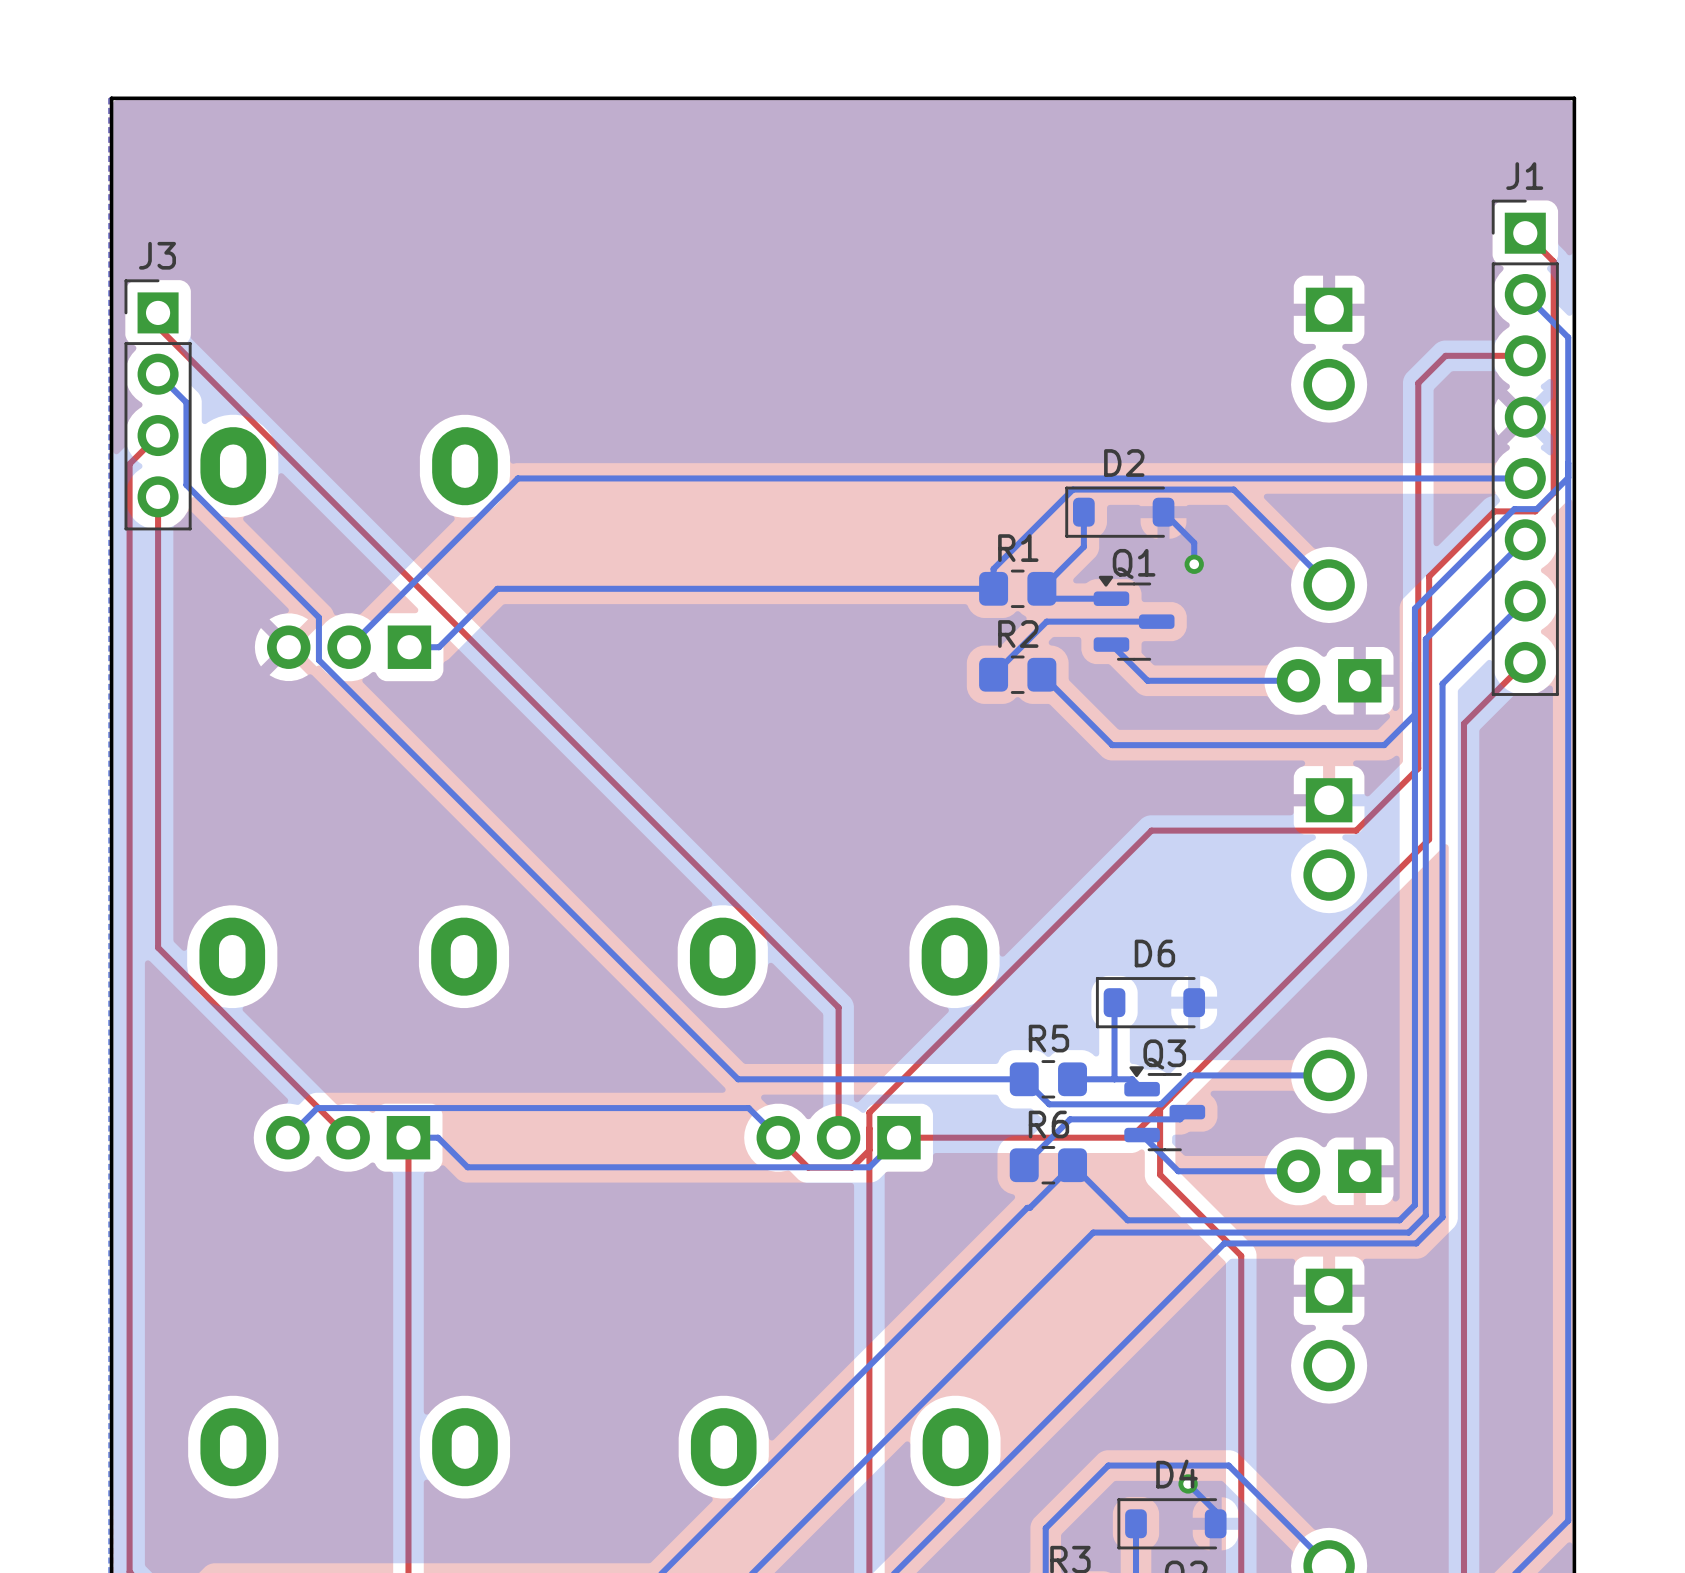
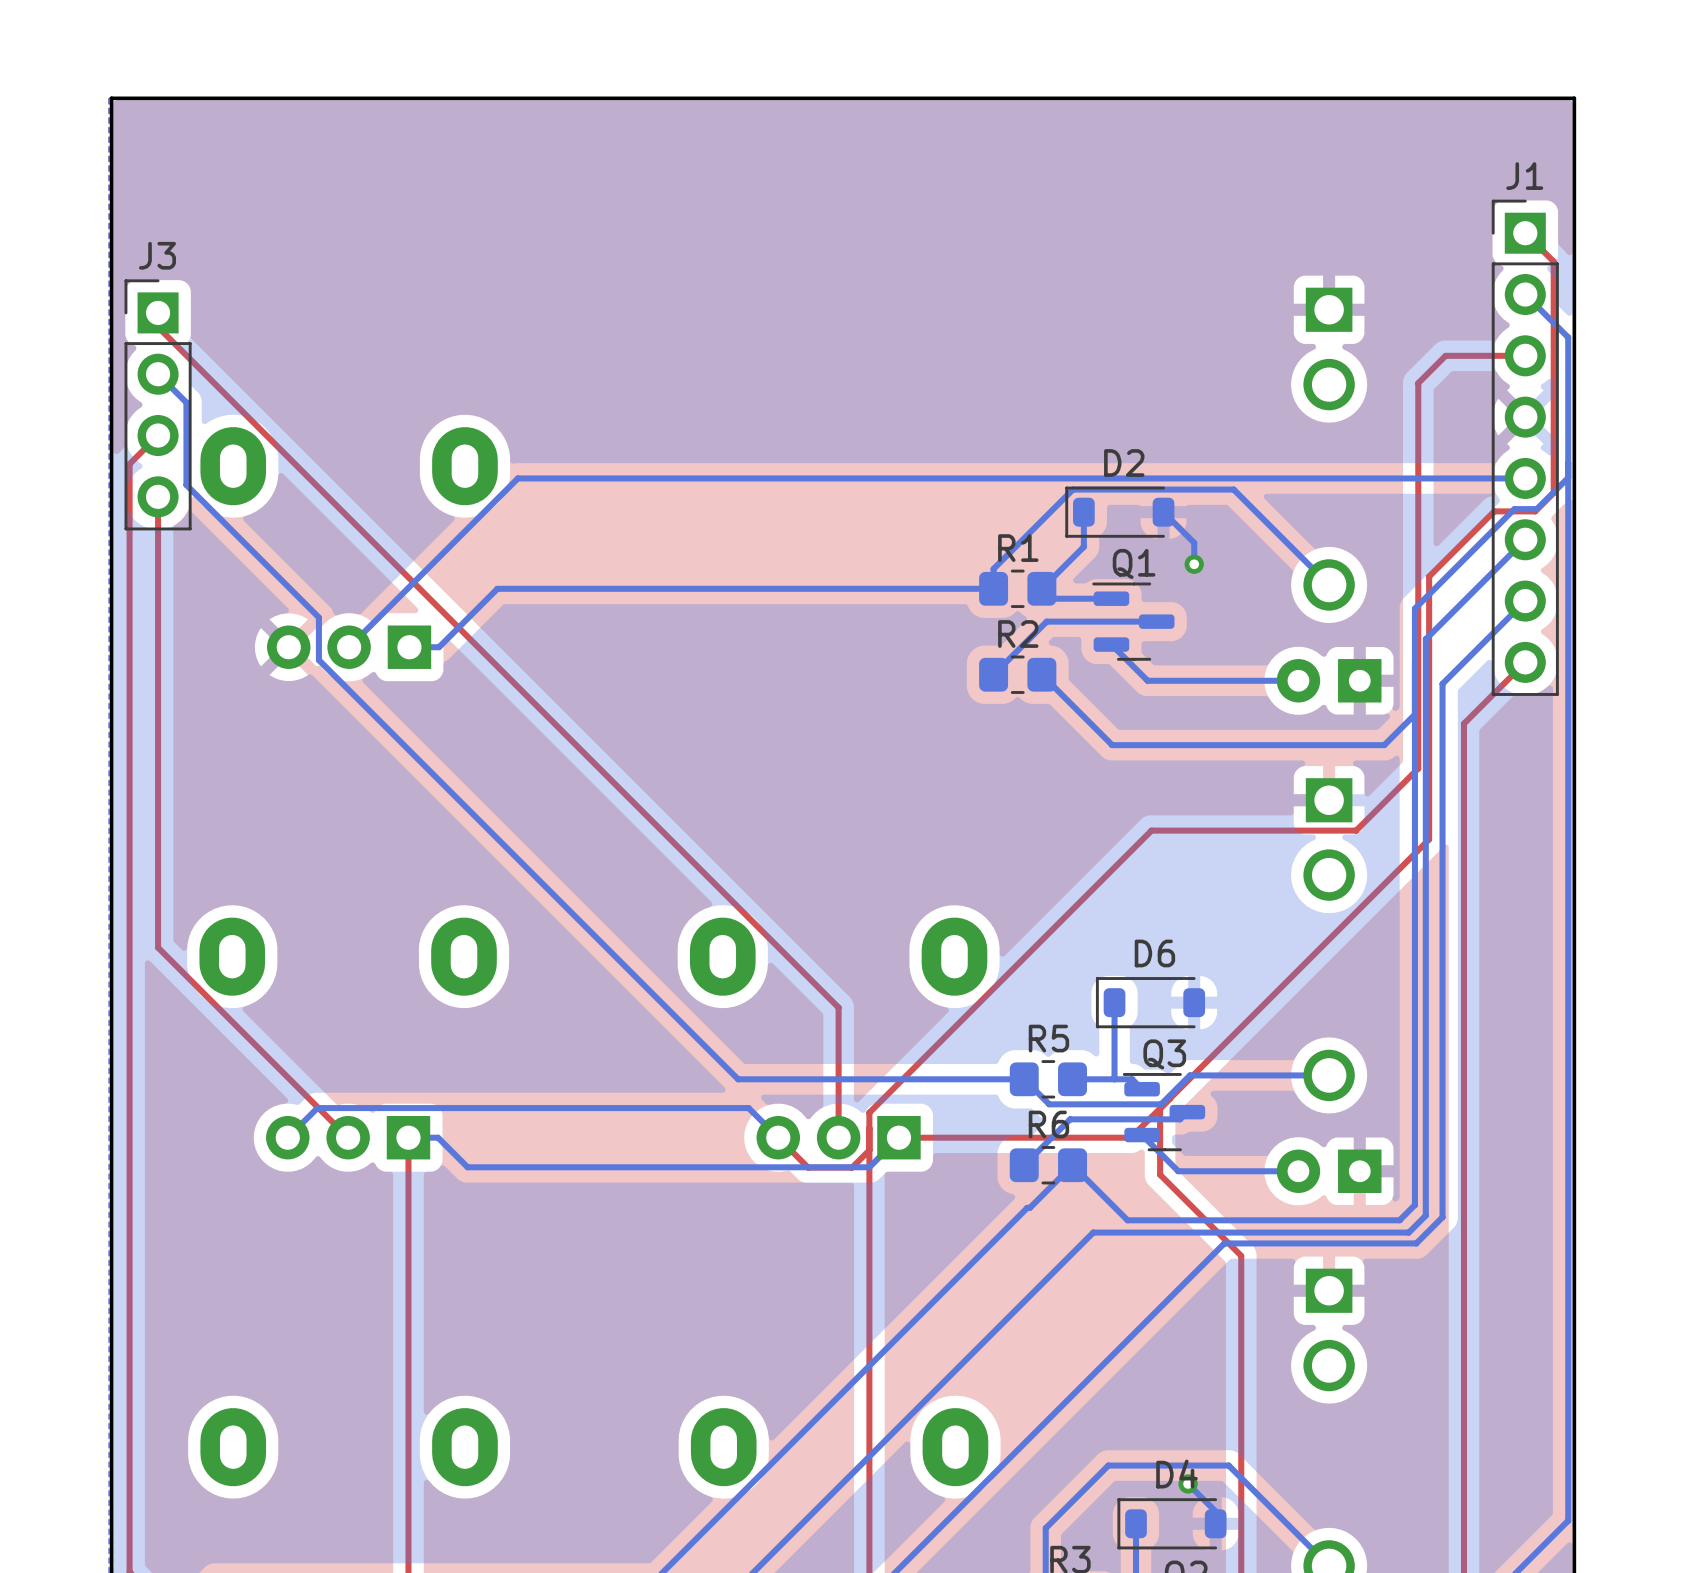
Q1 footprint: [1093, 575, 1175, 661] -> [1092, 582, 1175, 661]
Q3 footprint: [1124, 1066, 1206, 1152] -> [1122, 1073, 1206, 1152]

